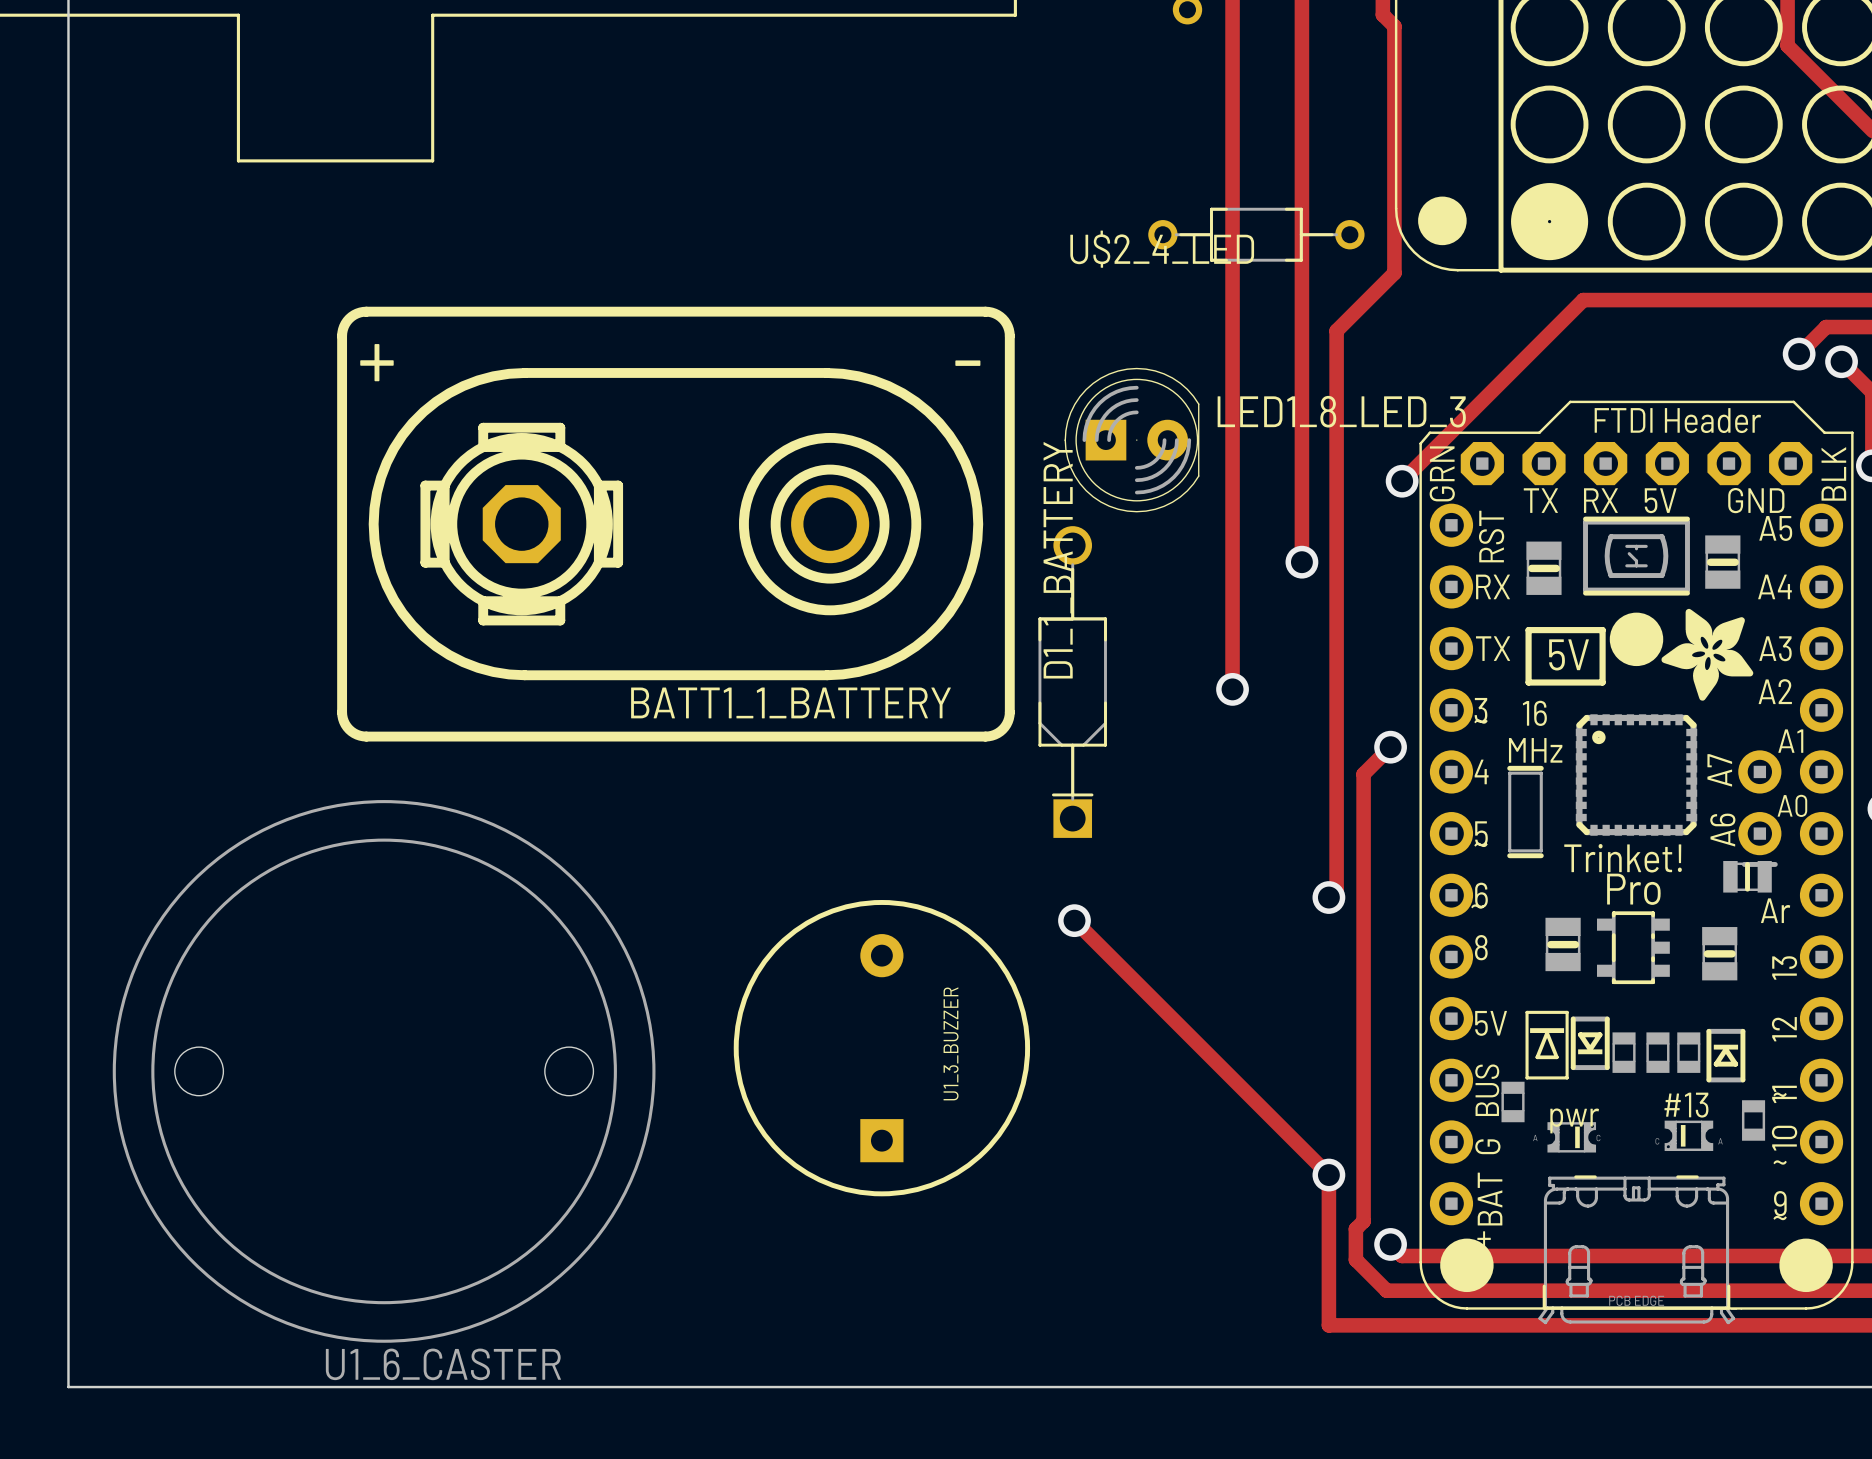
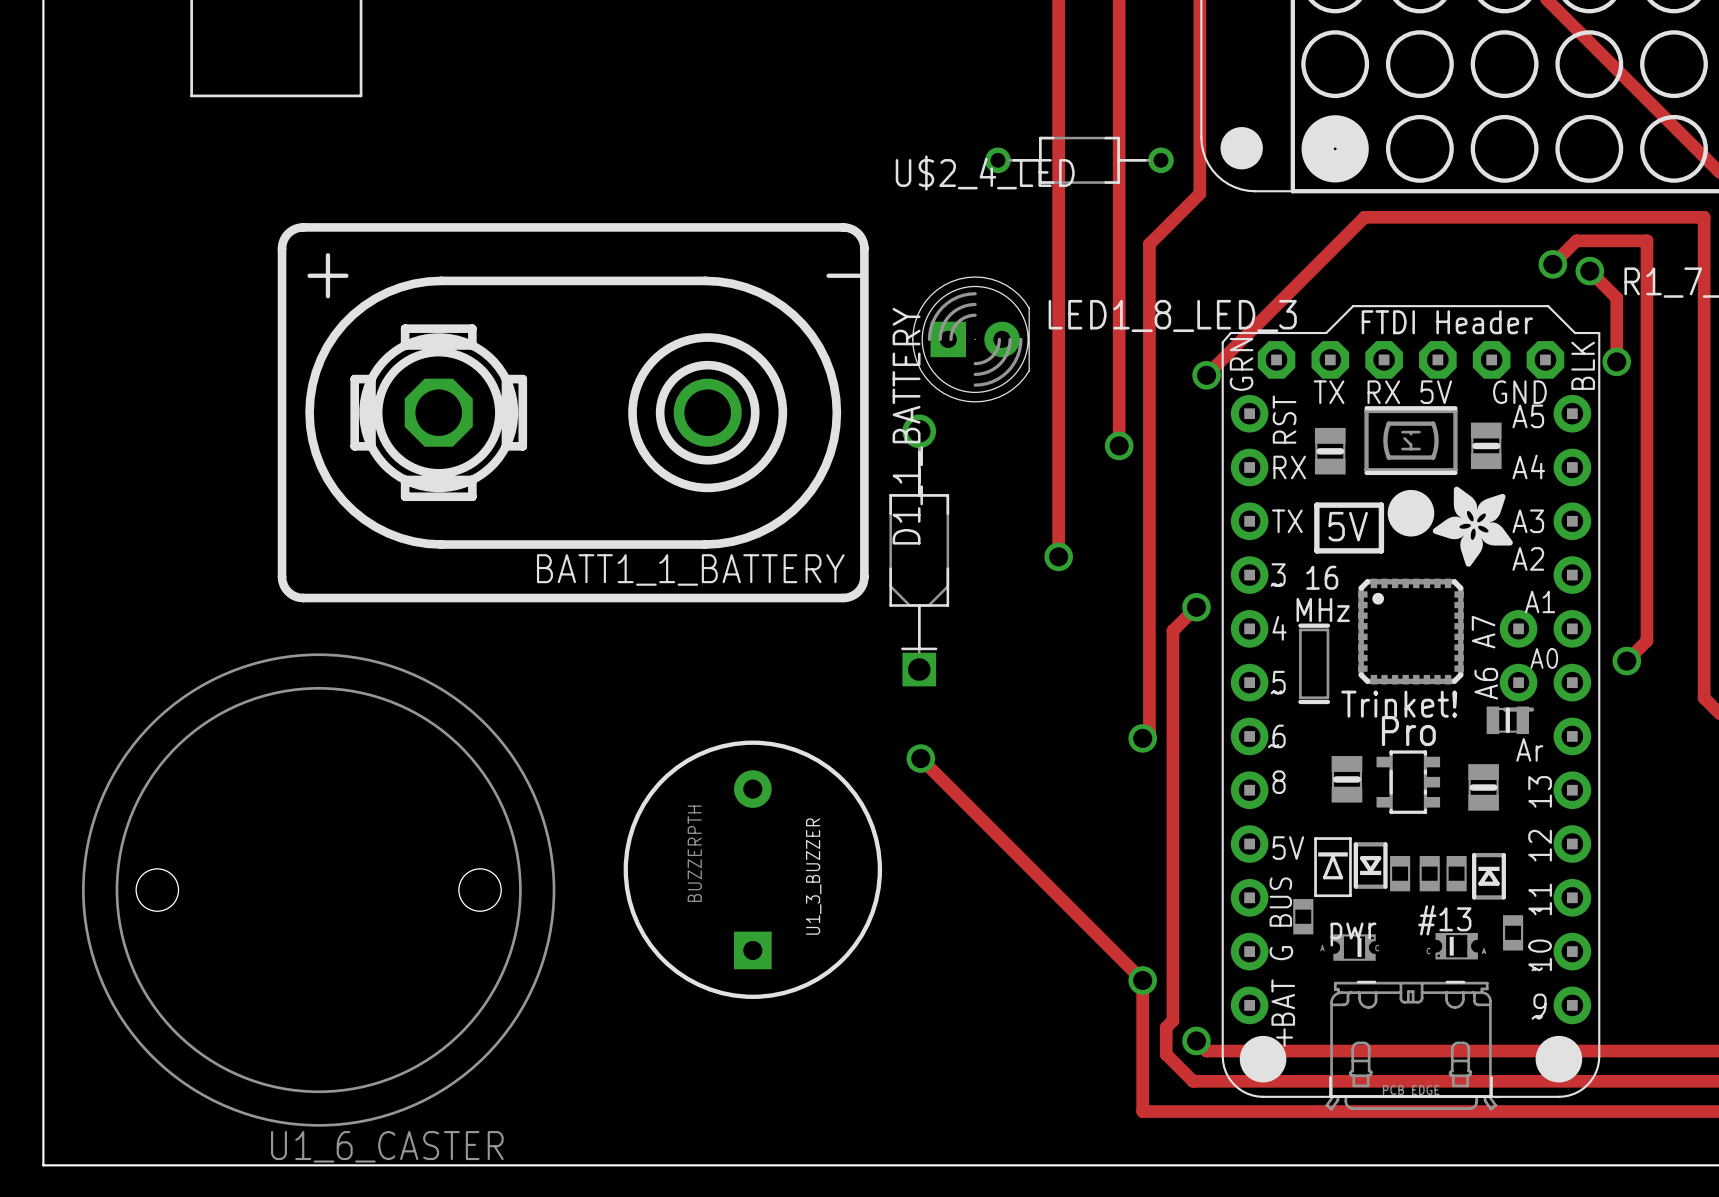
U1_3_BUZZER value: none -> BUZZERPTH (694, 853)

